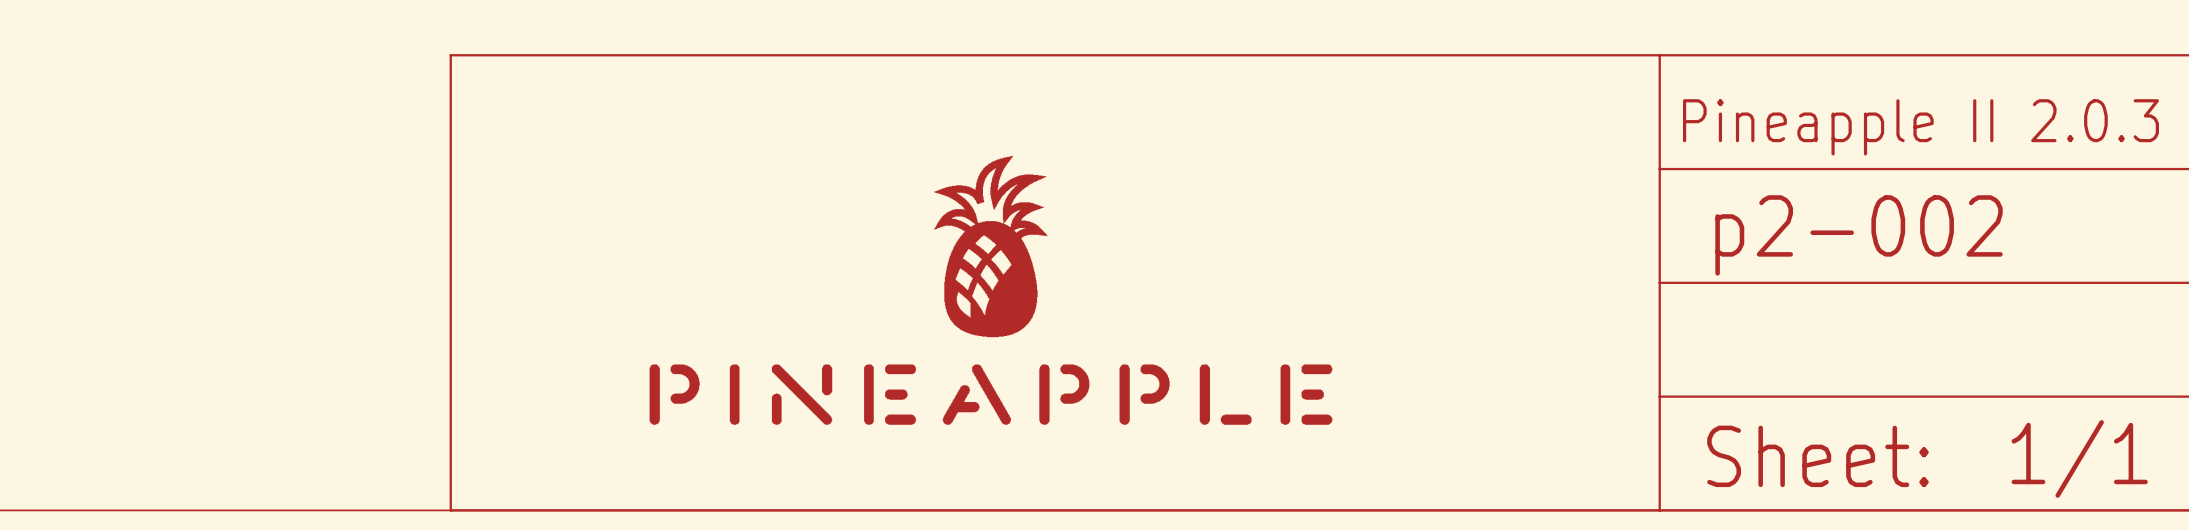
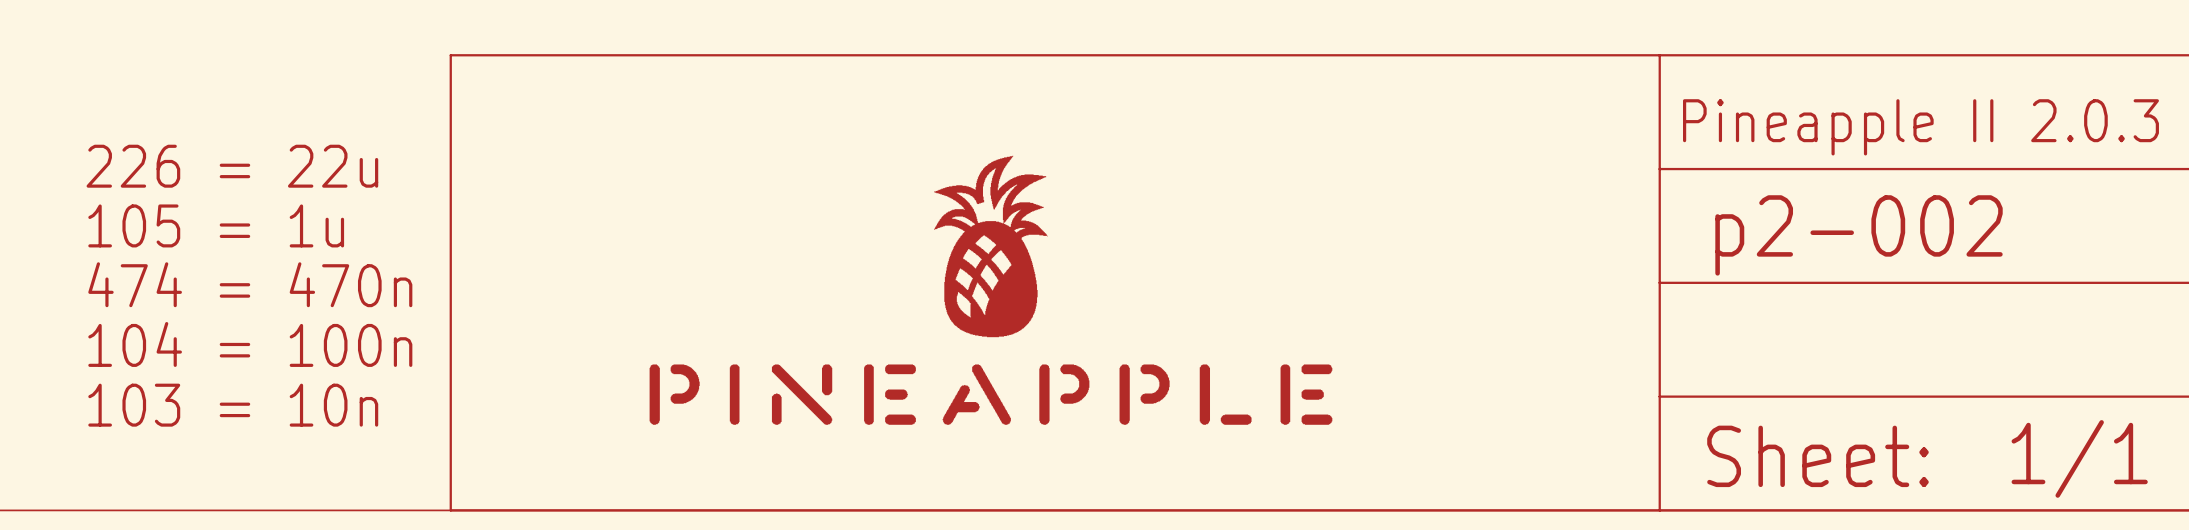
text: none -> 226 = 22u (232, 166)
text: none -> 105 = 1u (216, 225)
text: none -> 474 = 470n (250, 284)
text: none -> 104 = 100n (250, 344)
text: none -> 103 = 10n (233, 405)

